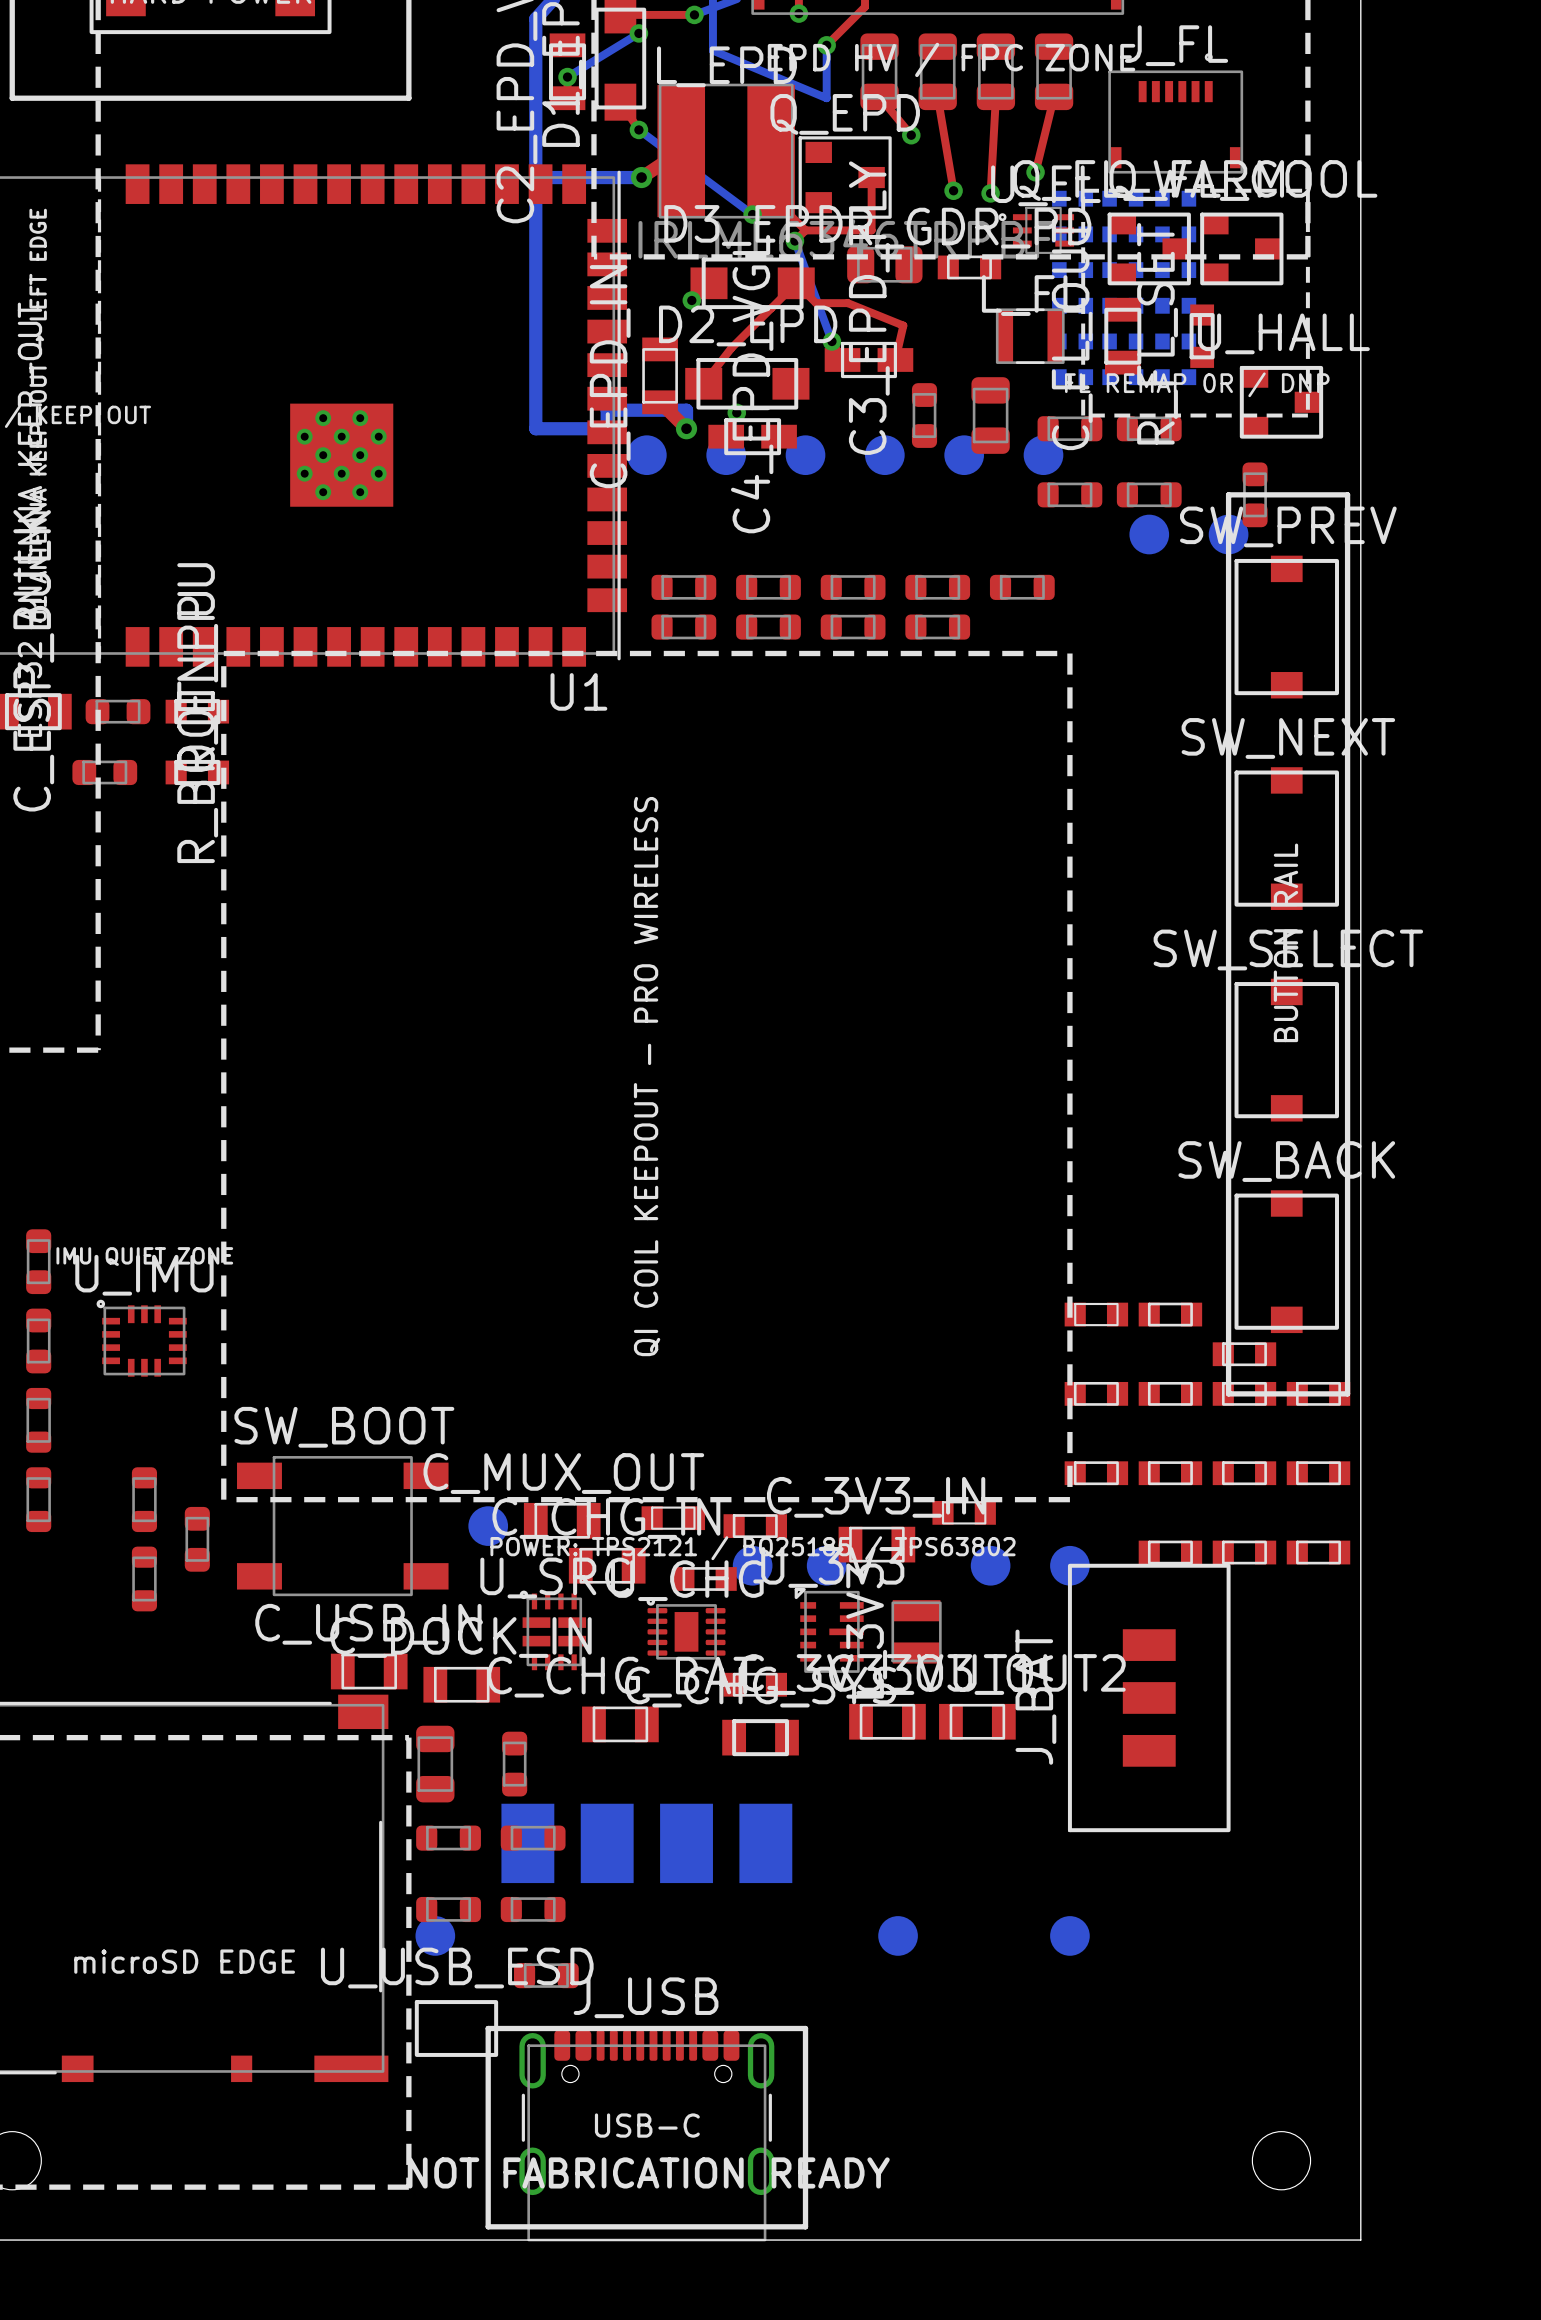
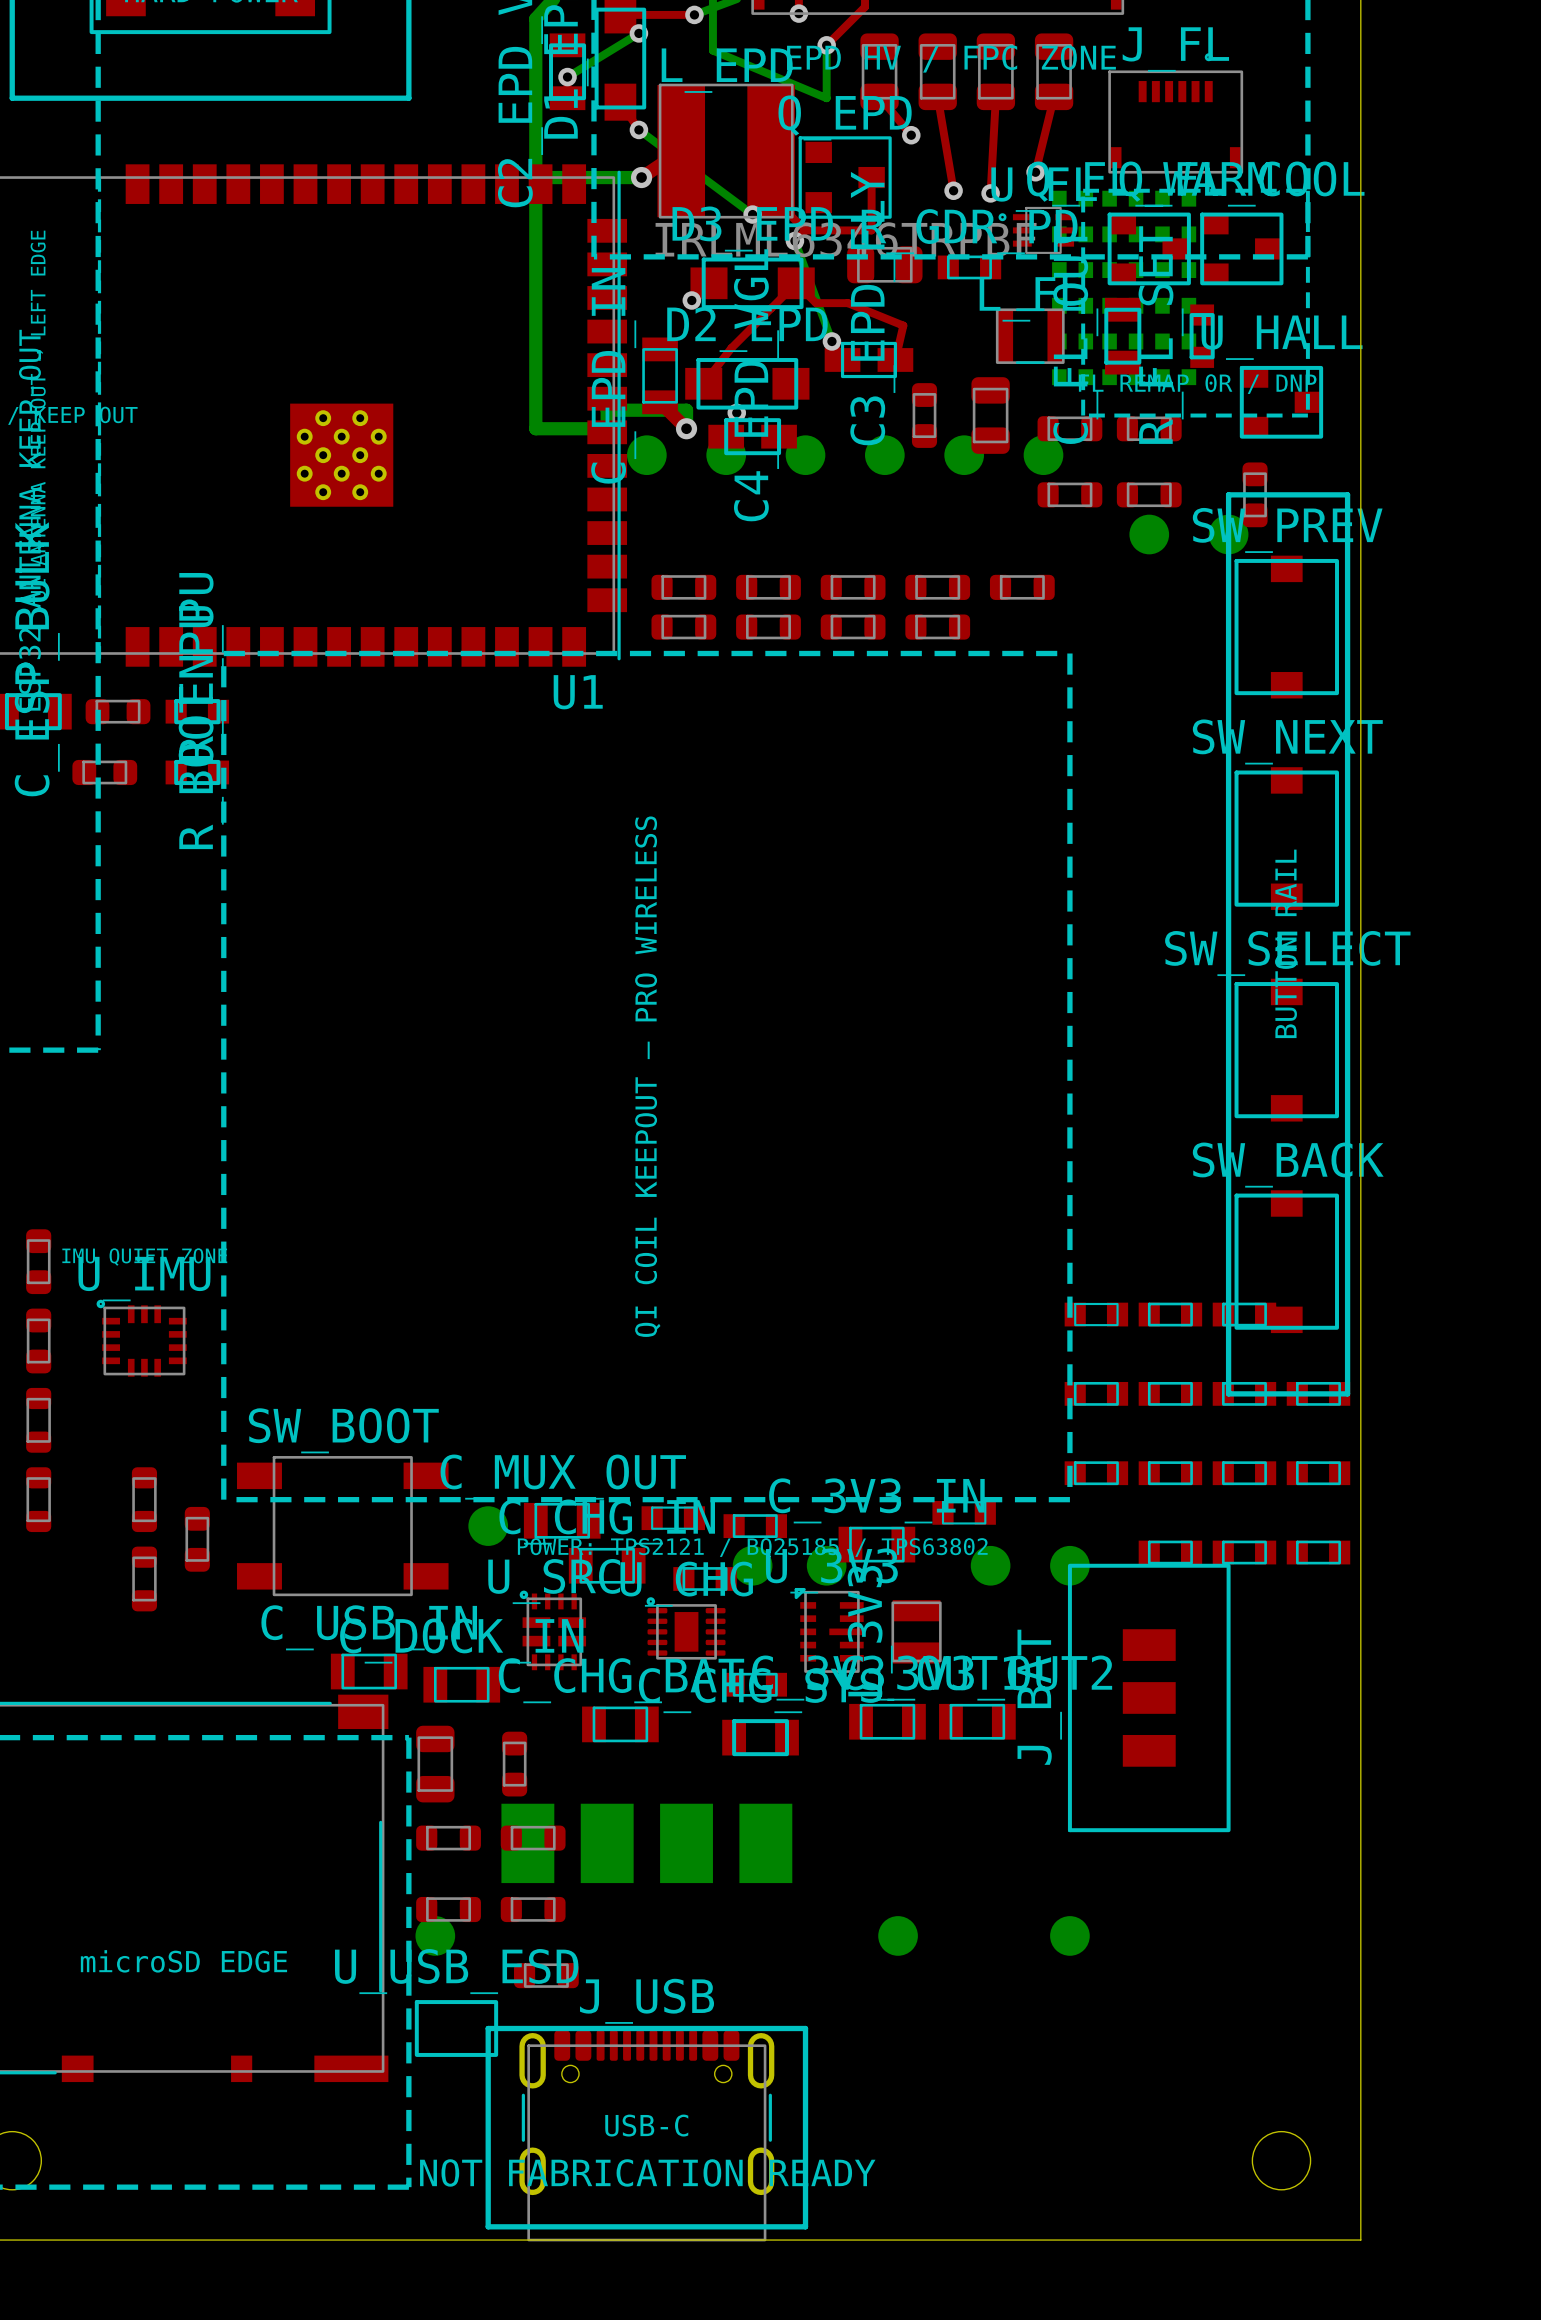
part position: (1244, 1354) -> (1244, 1314)

